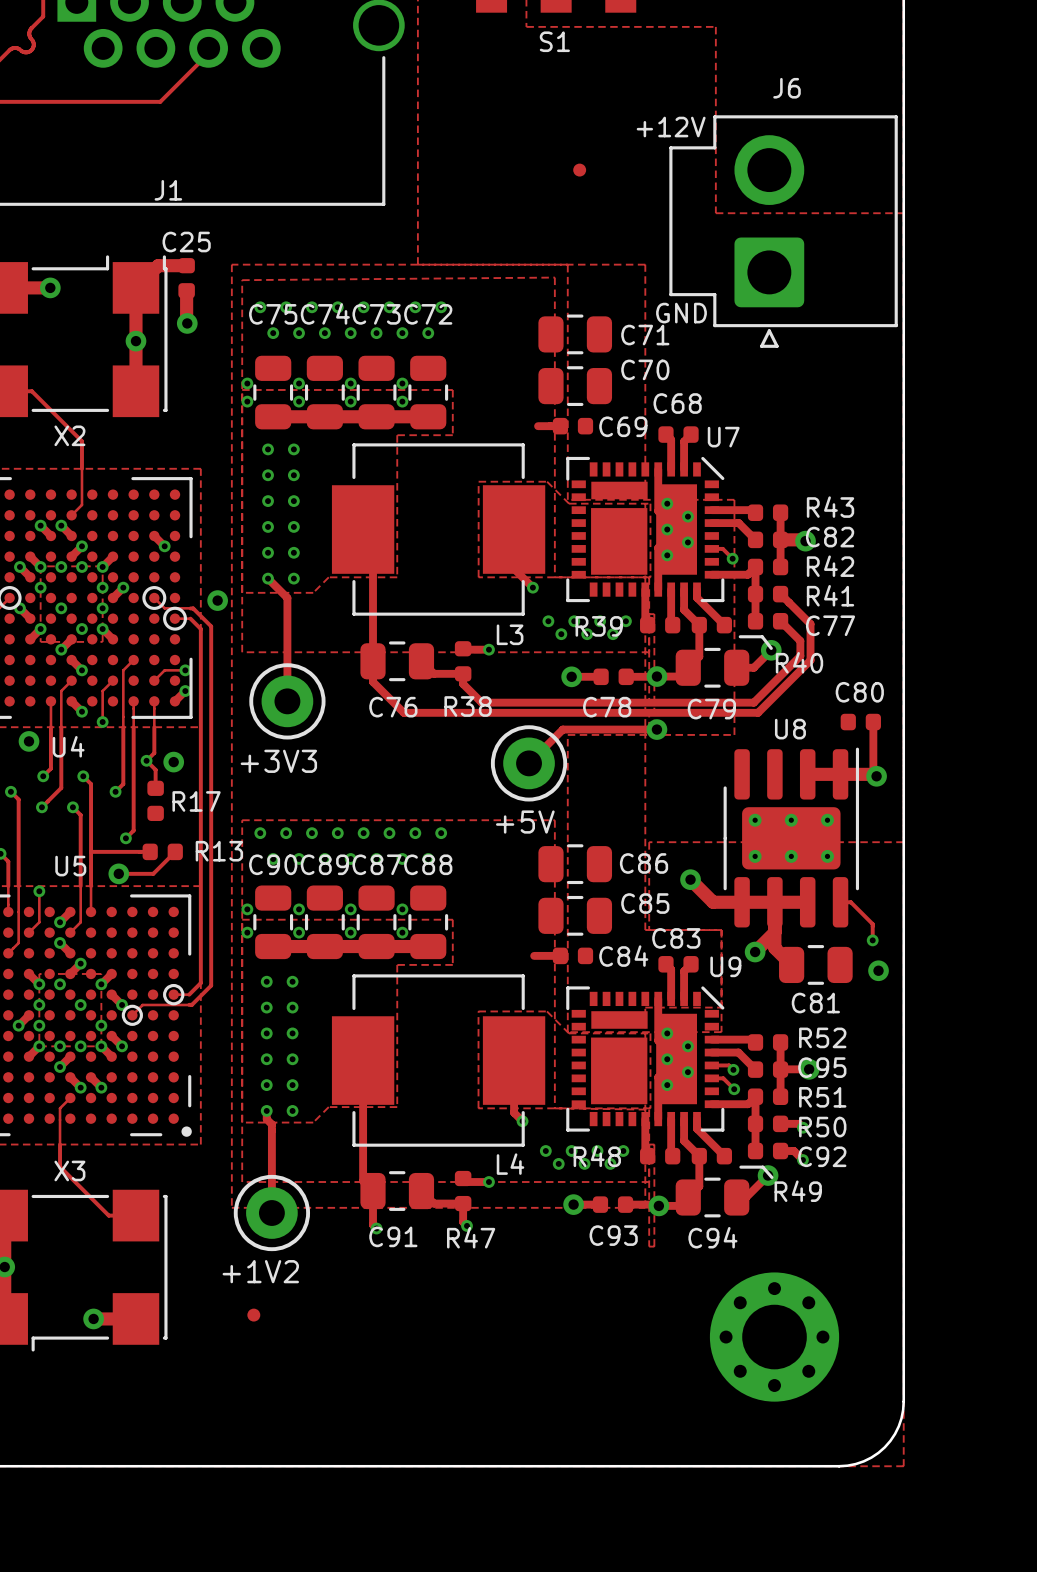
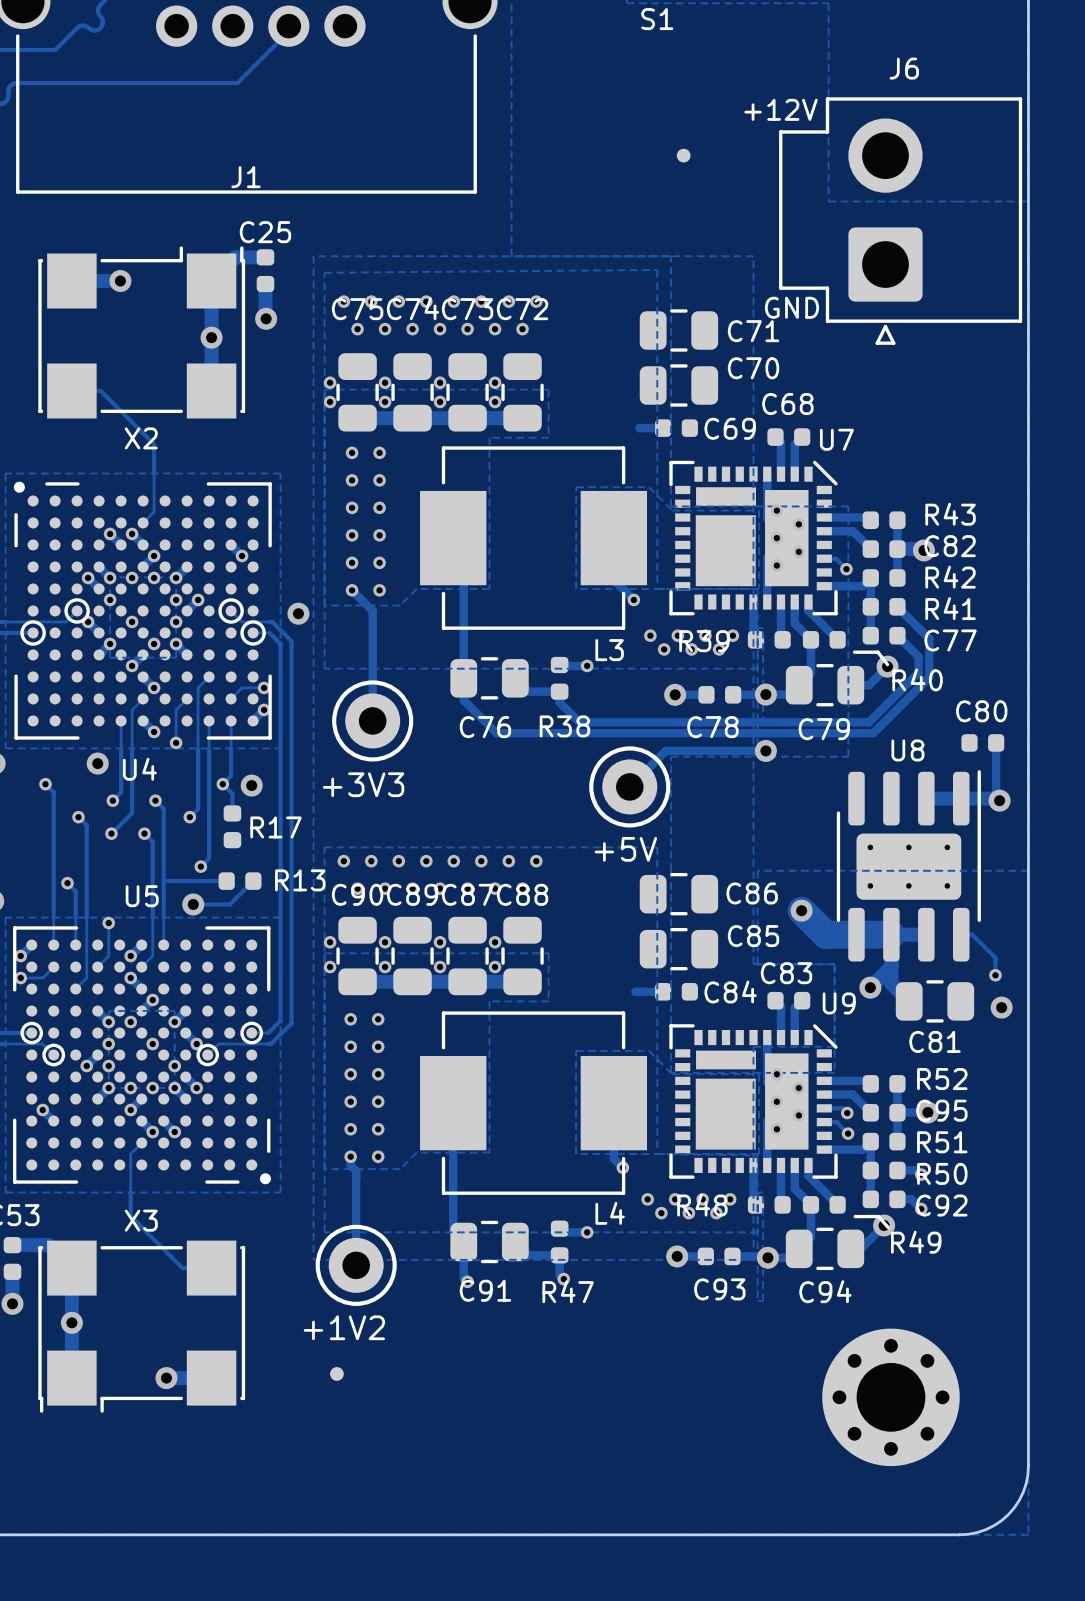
track width: thin (690, 879) (713, 902) (774, 902) -> thick (801, 910) (825, 934) (891, 934)

